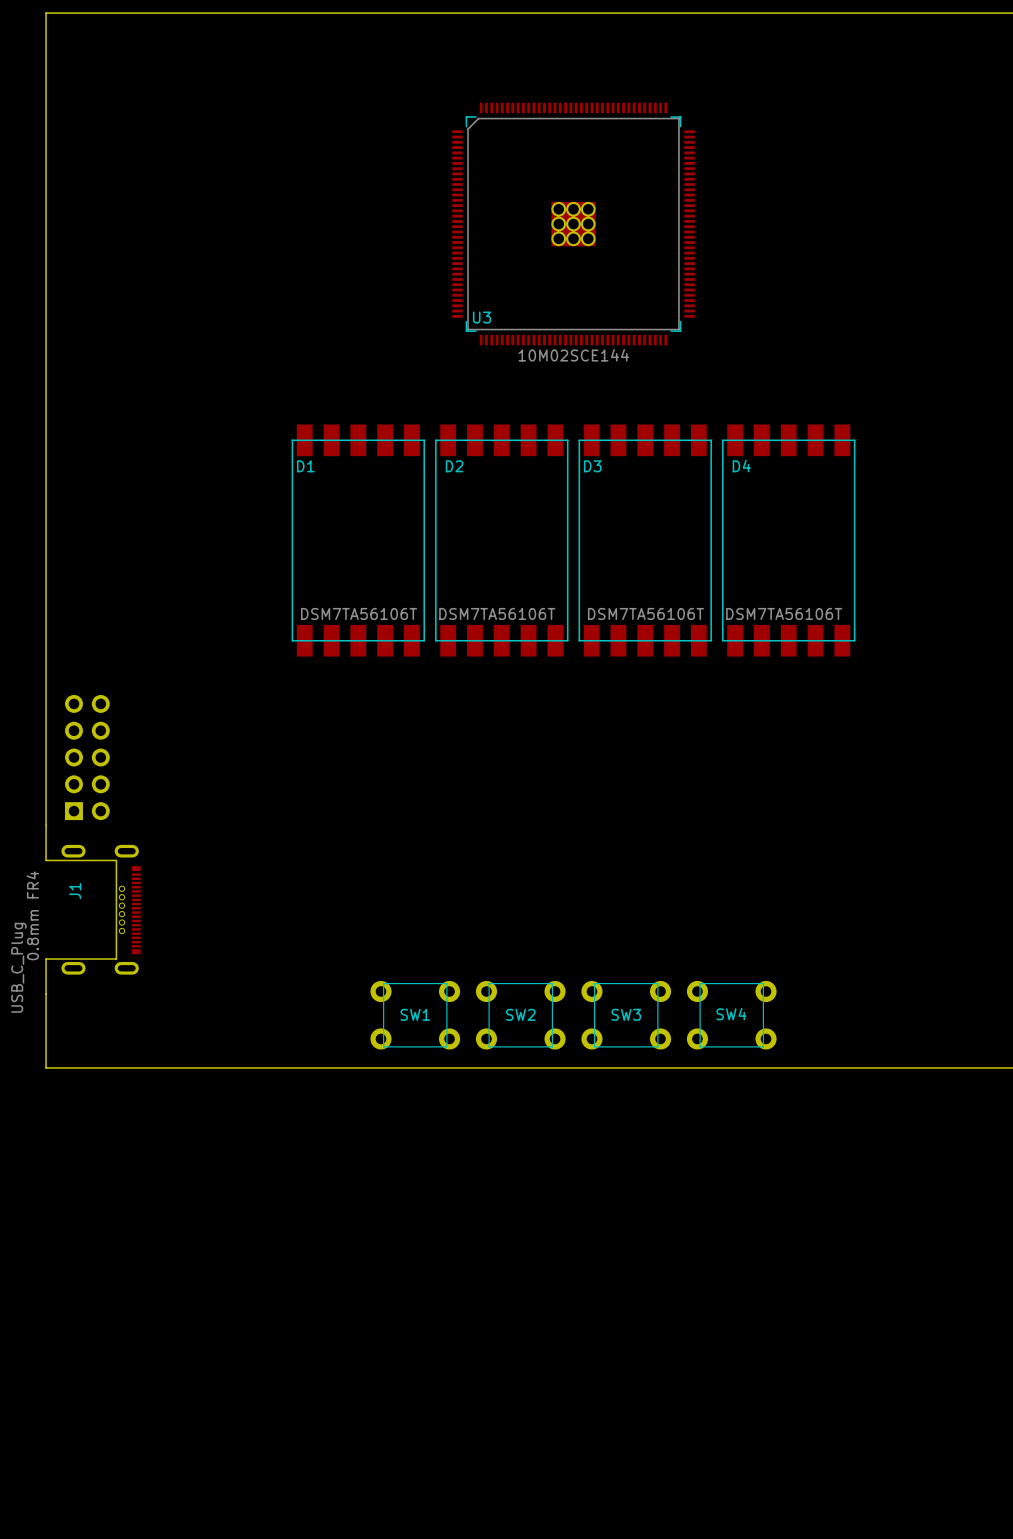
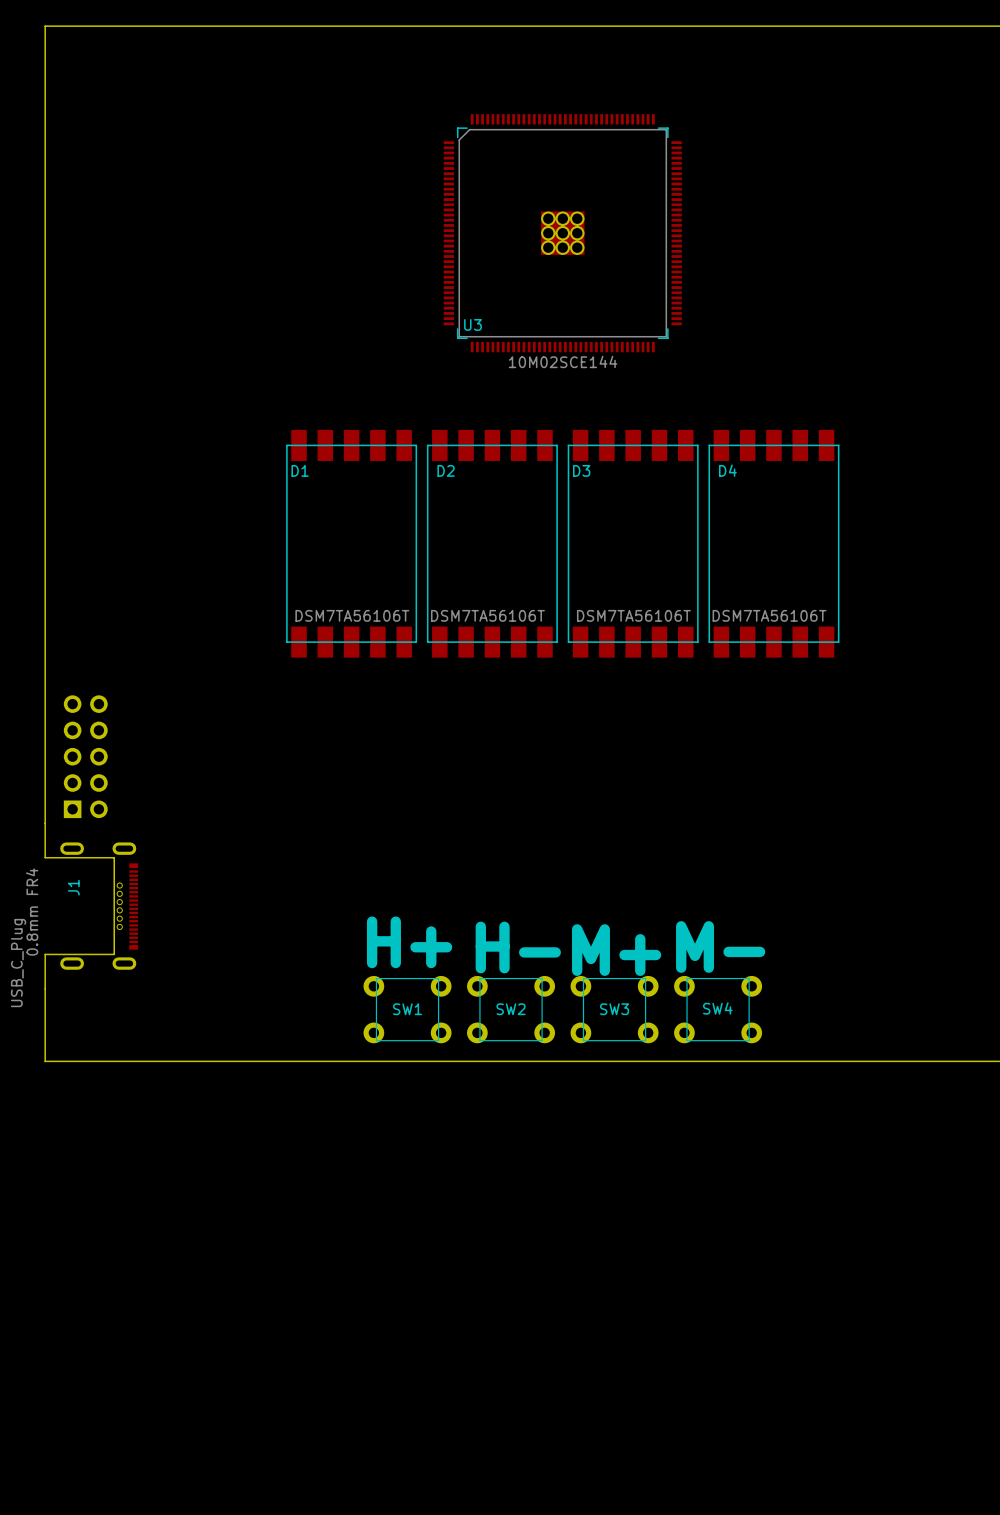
text: none -> H+ (409, 942)
text: none -> H- (518, 947)
text: none -> M- (720, 946)
text: none -> M+ (616, 950)

